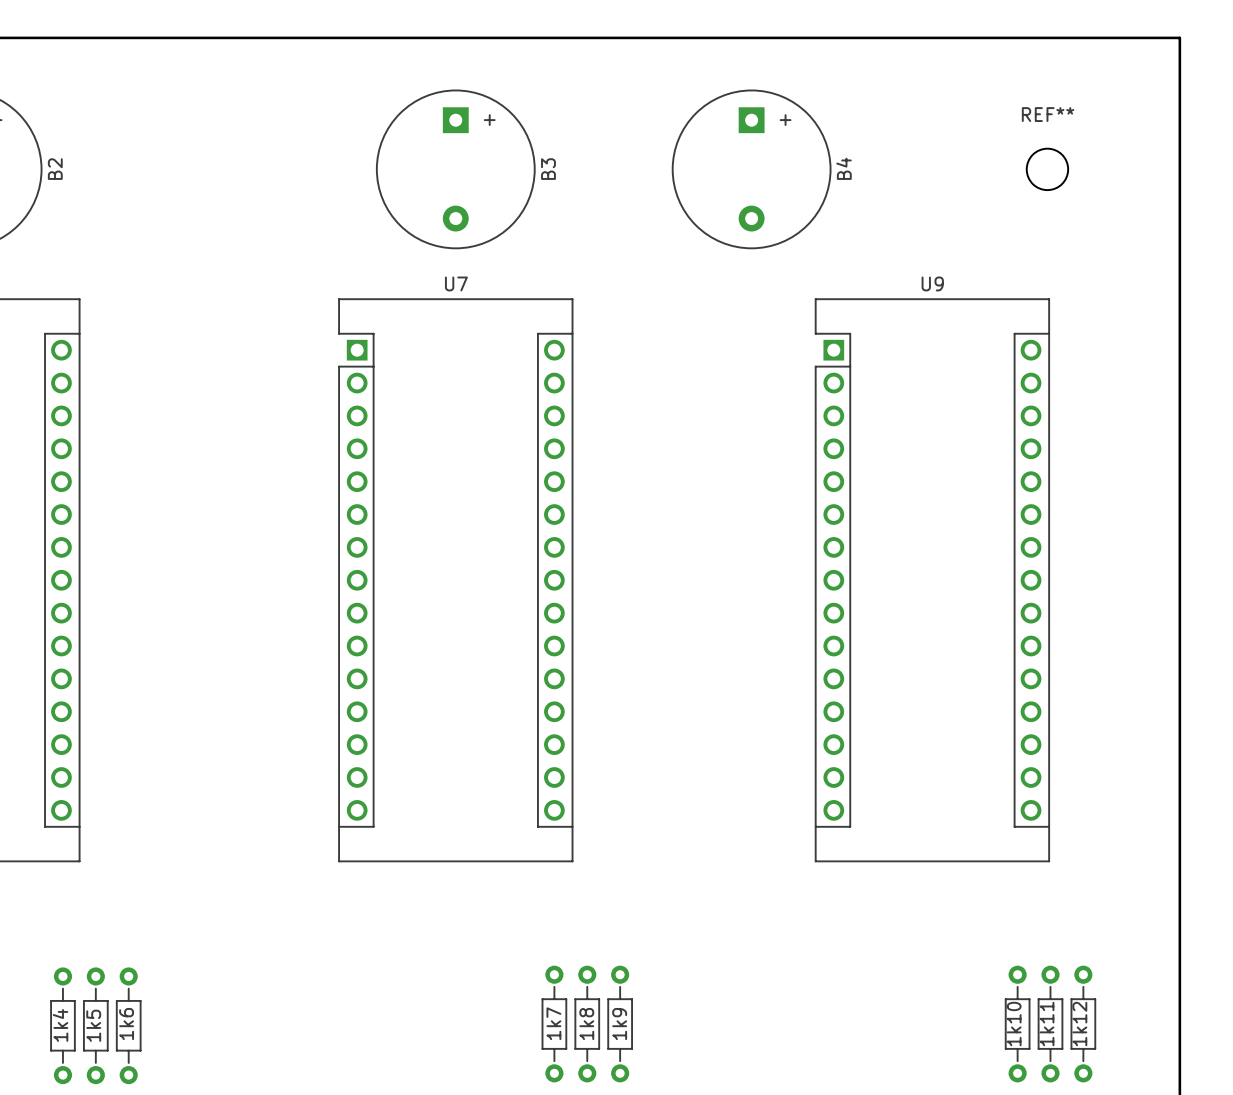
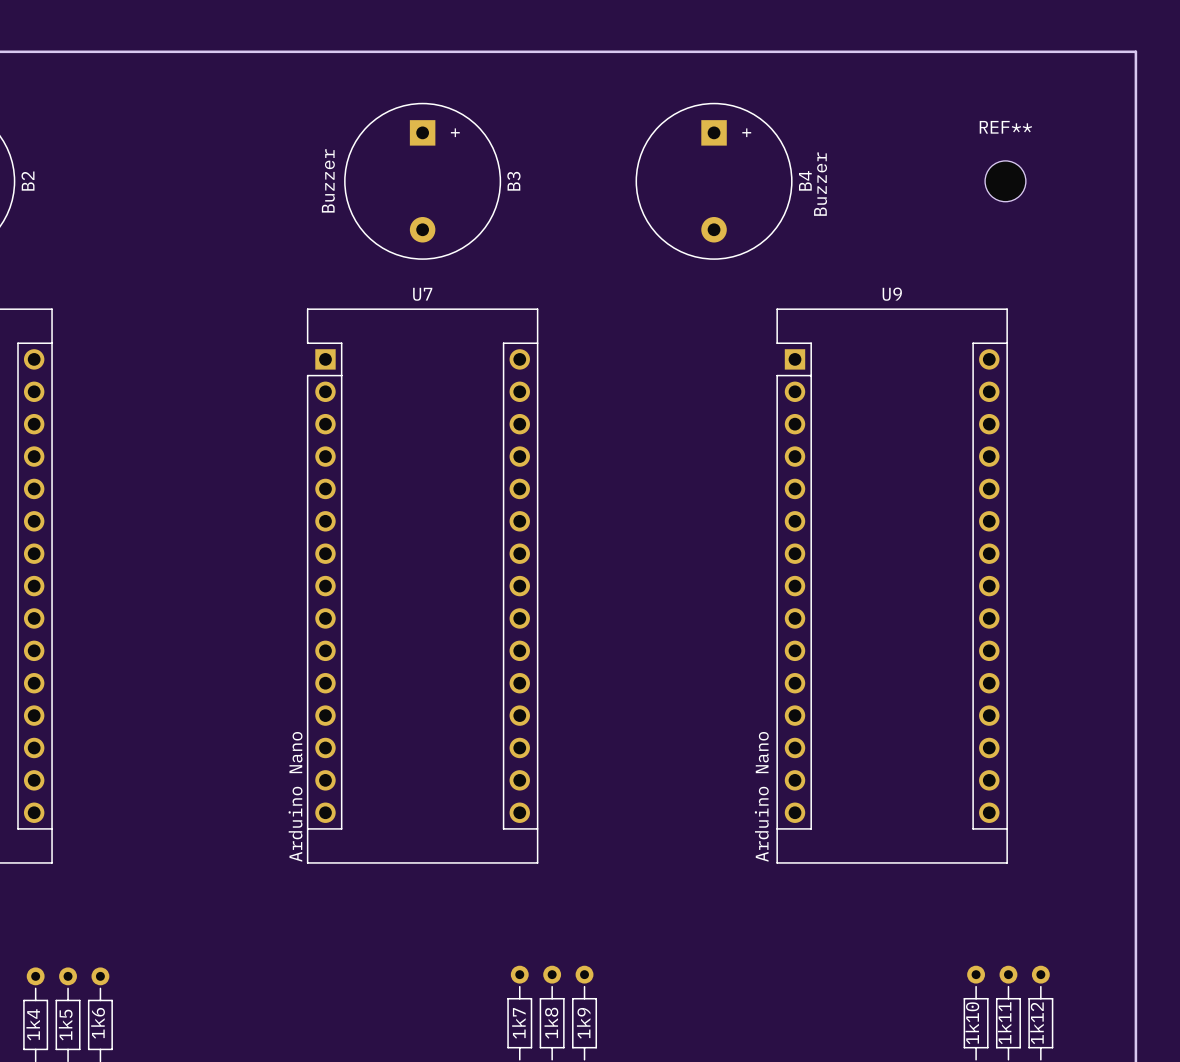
text: none -> Buzzer (328, 180)
text: none -> Buzzer (820, 184)
text: none -> Arduino Nano (295, 796)
text: none -> Arduino Nano (761, 796)

